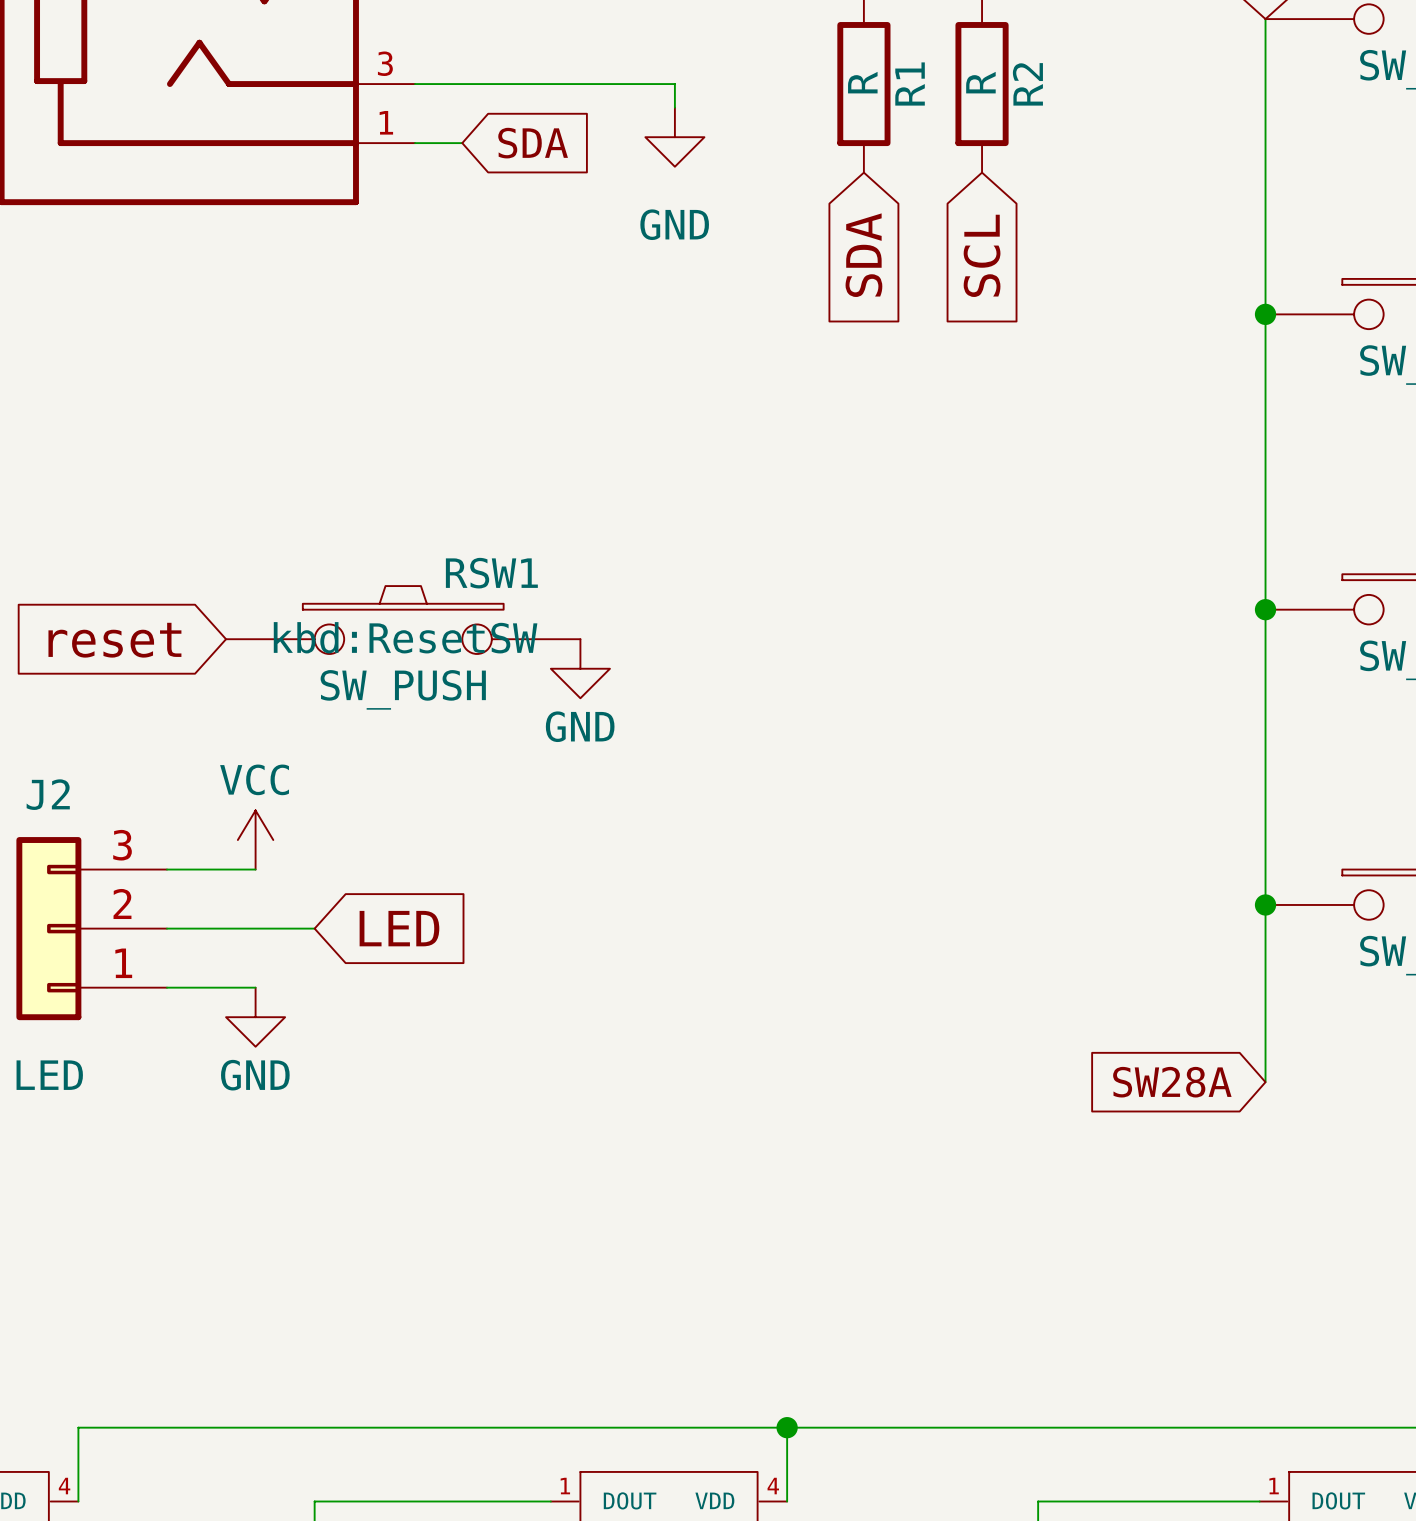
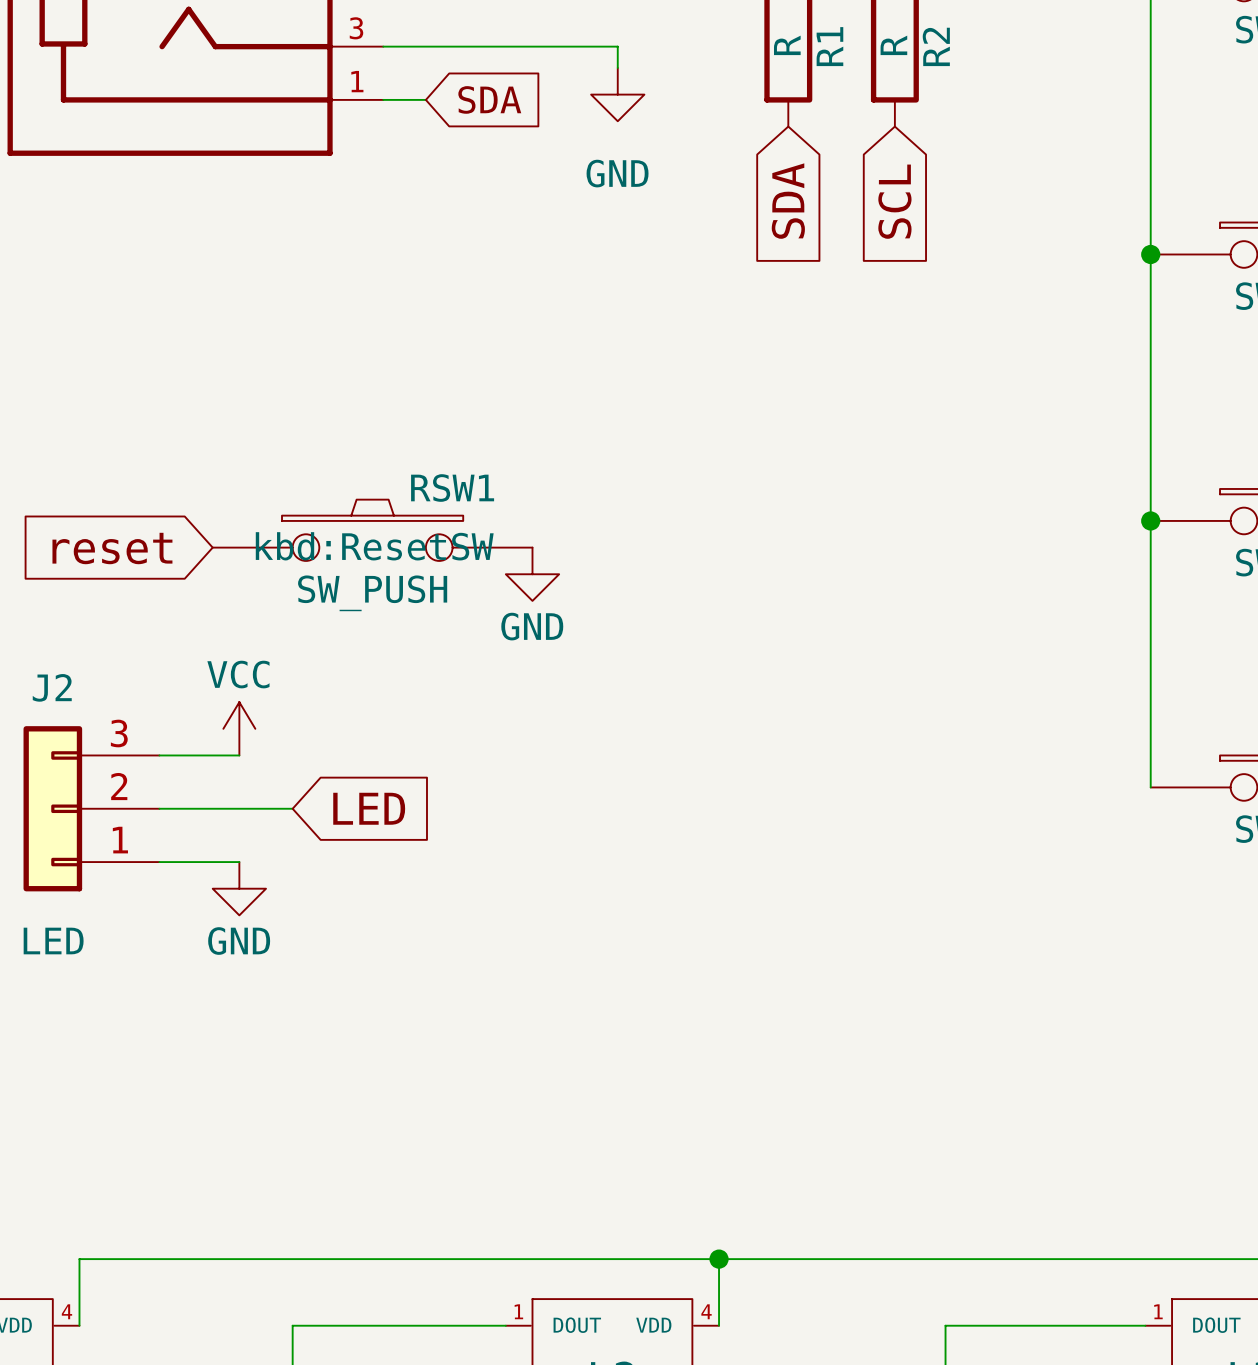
wire: (1265, 904) (1265, 1082) -> none
junction: (1265, 904) -> none
global label: SW28A (1172, 1082) -> none

